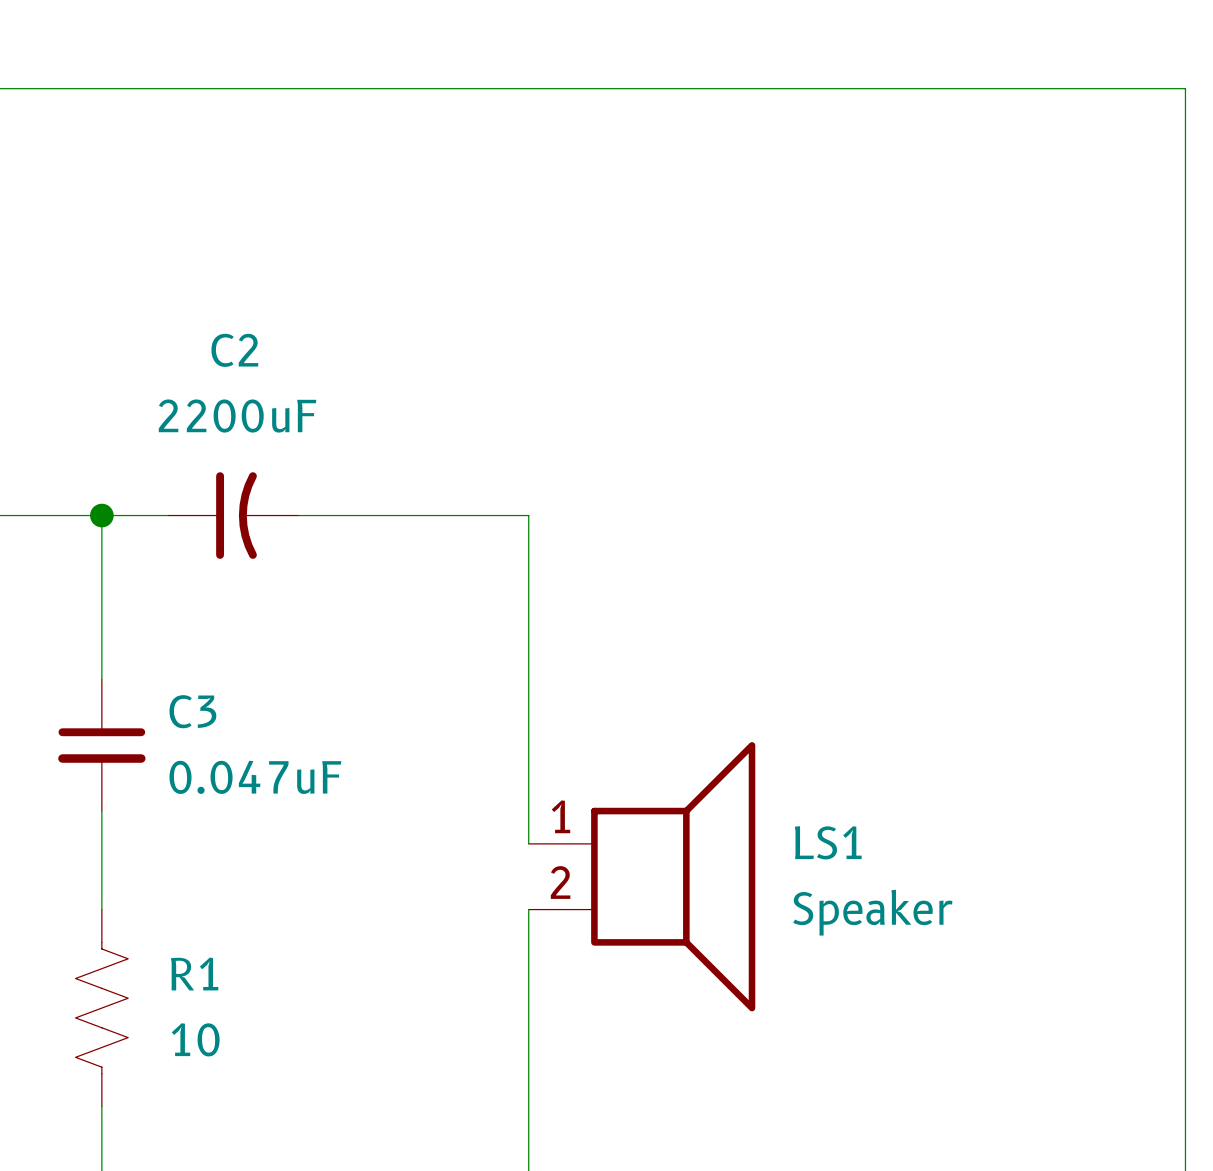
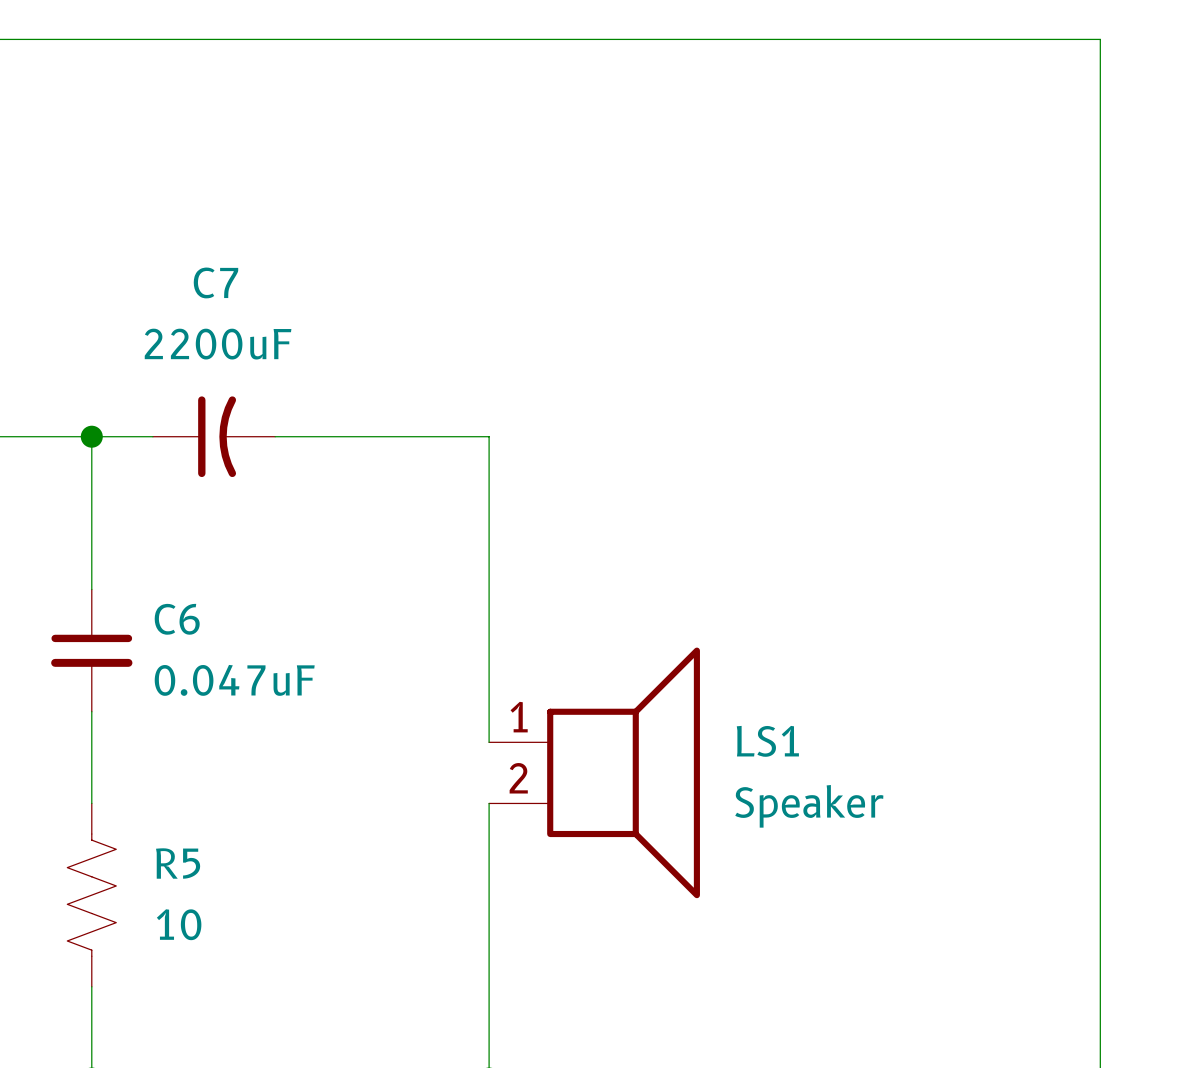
C2 name: C2 (234, 350) -> C7 (215, 282)
C3 name: C3 (192, 711) -> C6 (177, 619)
R1 name: R1 (194, 974) -> R5 (178, 863)

